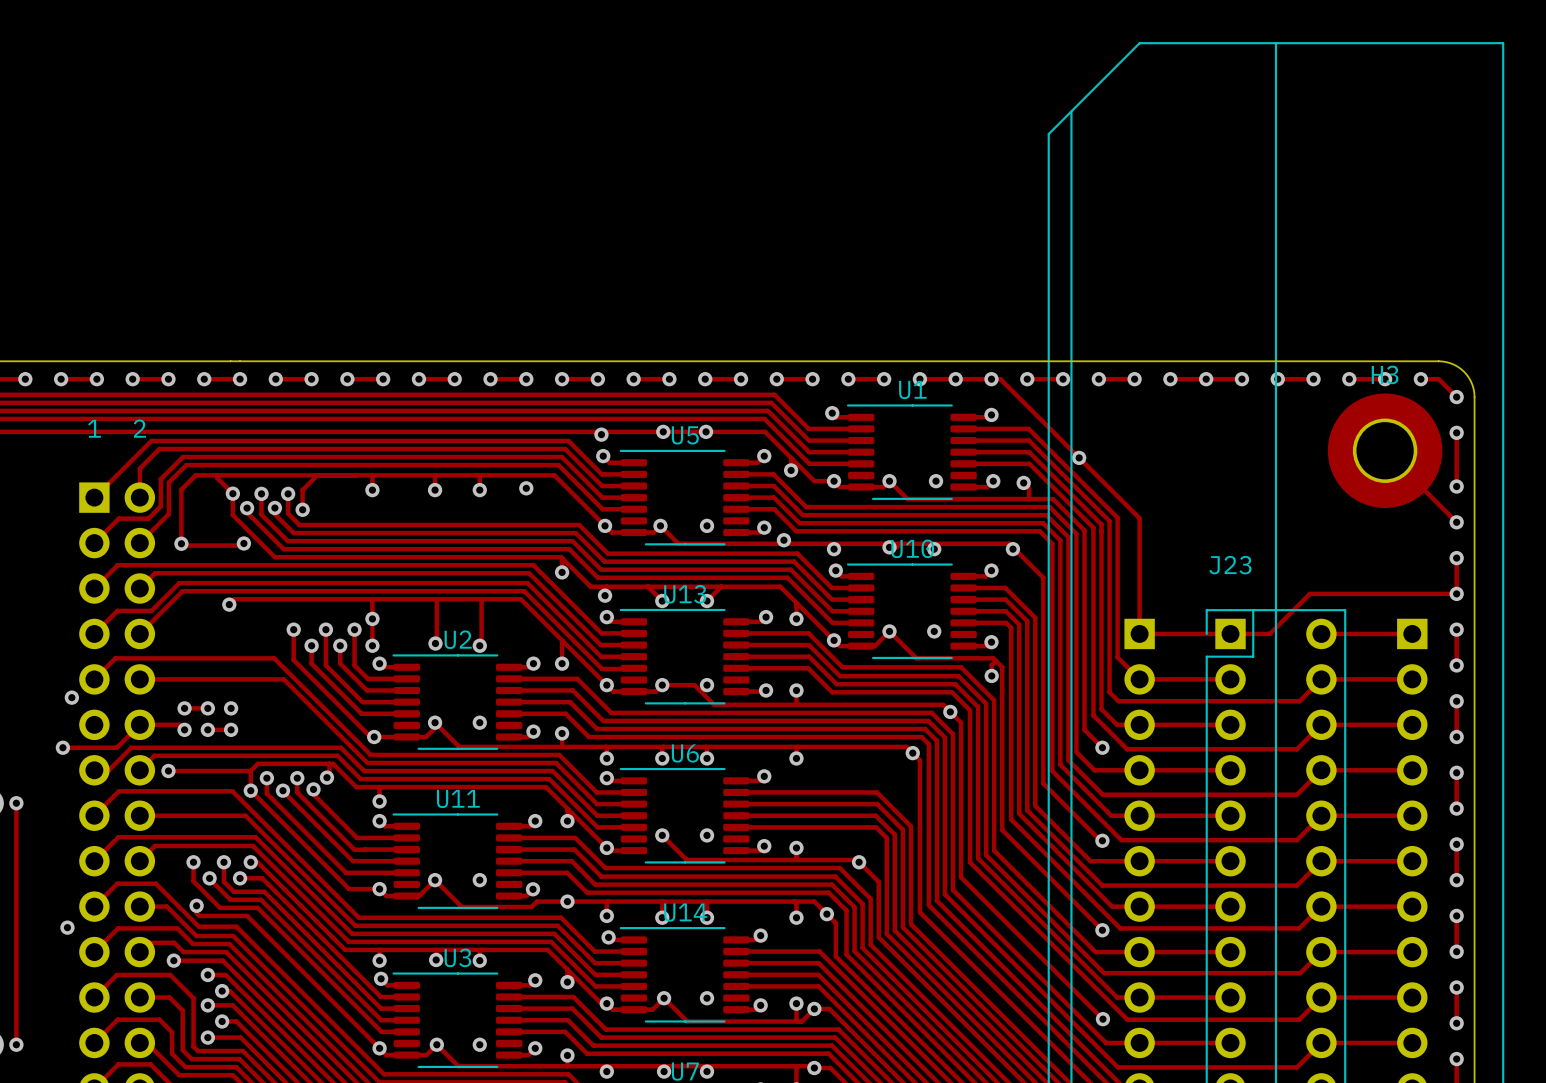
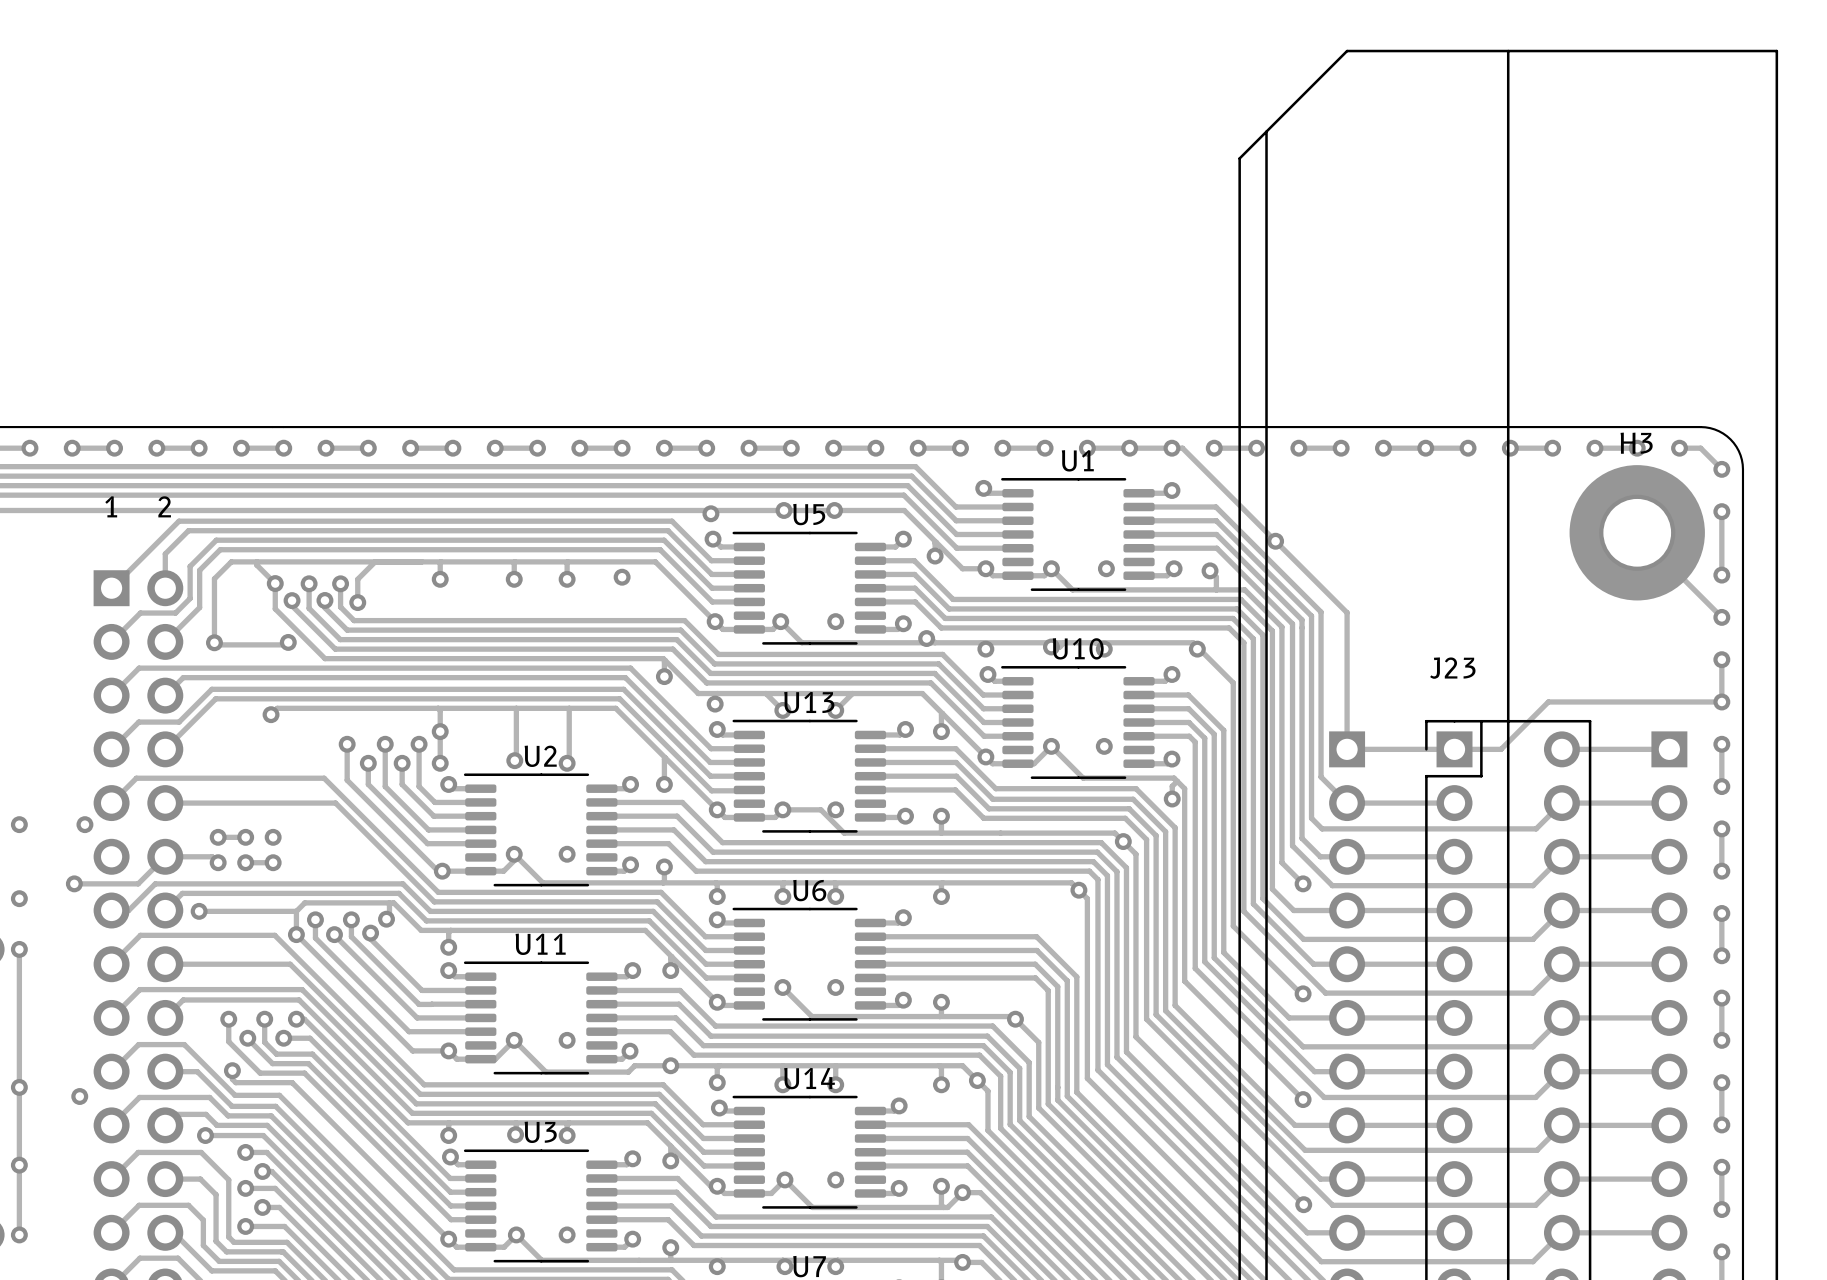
via: none -> (19, 824)
via: none -> (19, 898)
via: none -> (19, 1087)
via: none -> (19, 1165)

